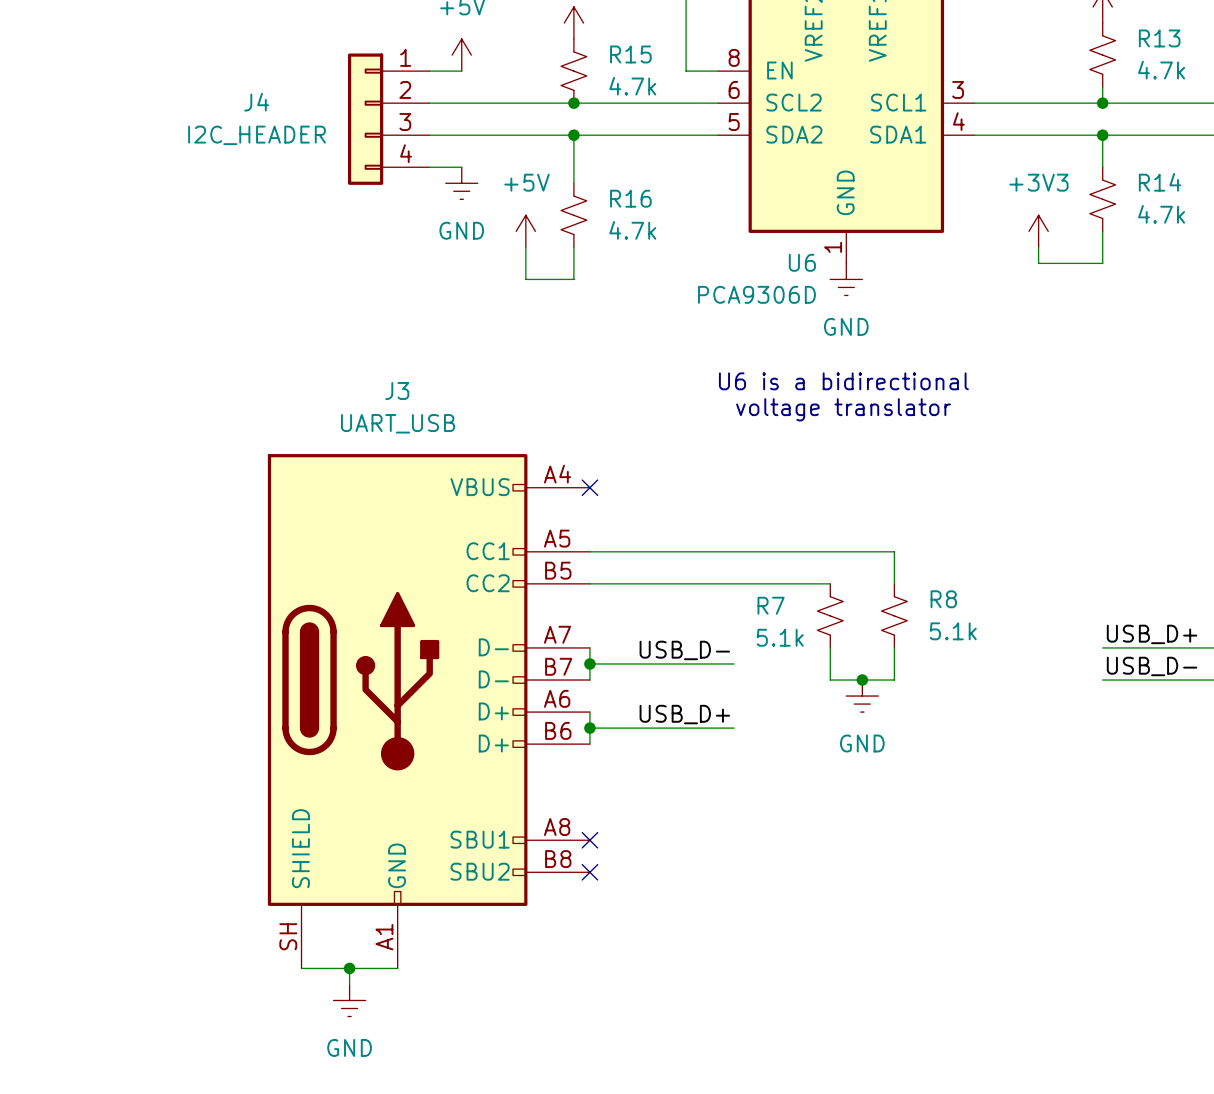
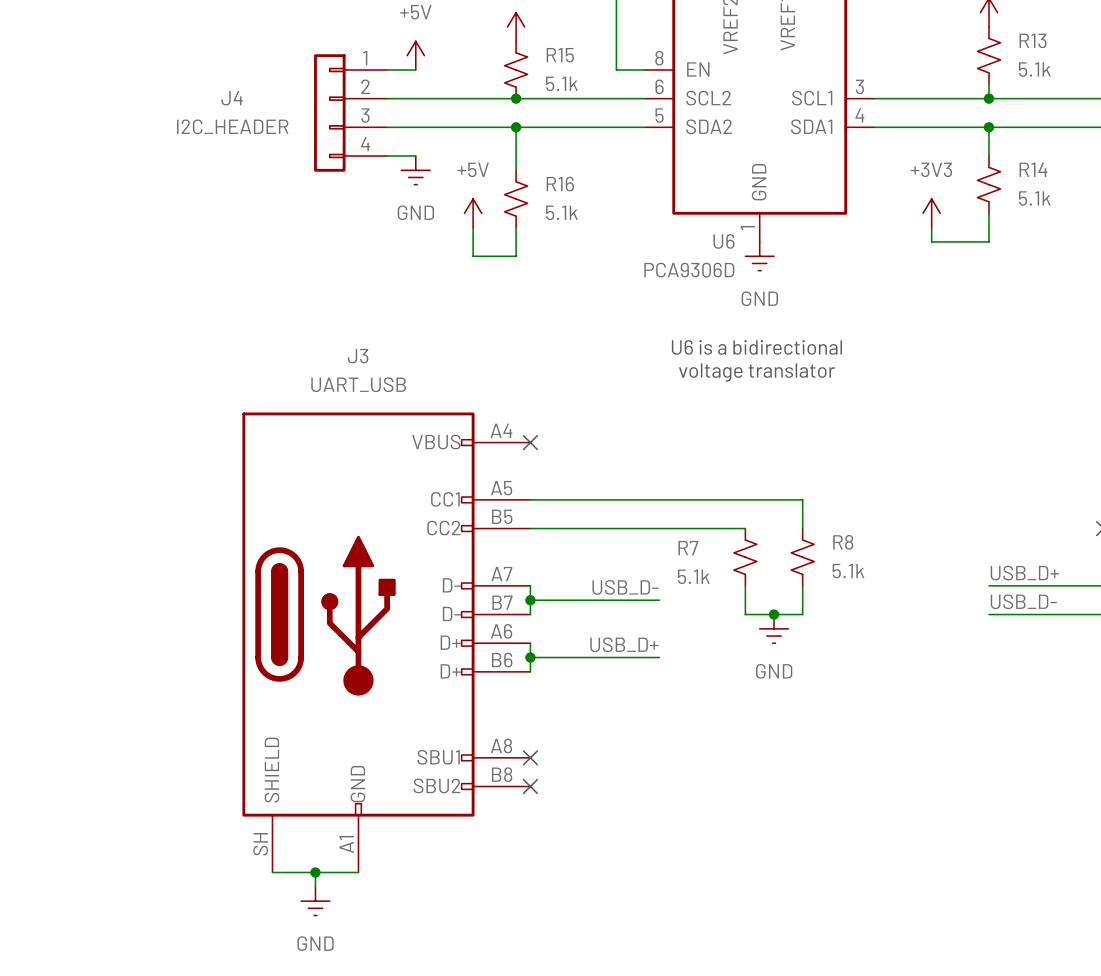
R13 value: 4.7k (1161, 70) -> 5.1k (1034, 69)
R15 value: 4.7k (632, 86) -> 5.1k (561, 83)
R14 value: 4.7k (1161, 214) -> 5.1k (1034, 198)
R16 value: 4.7k (632, 230) -> 5.1k (561, 212)

